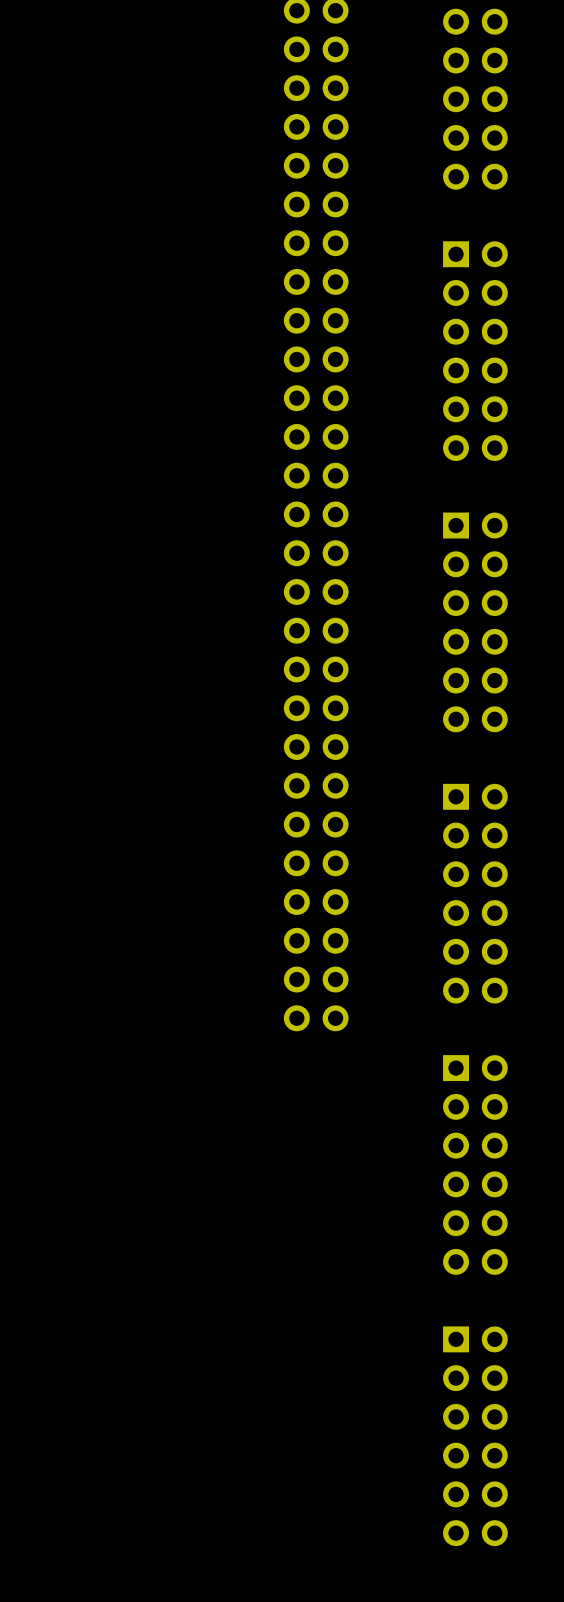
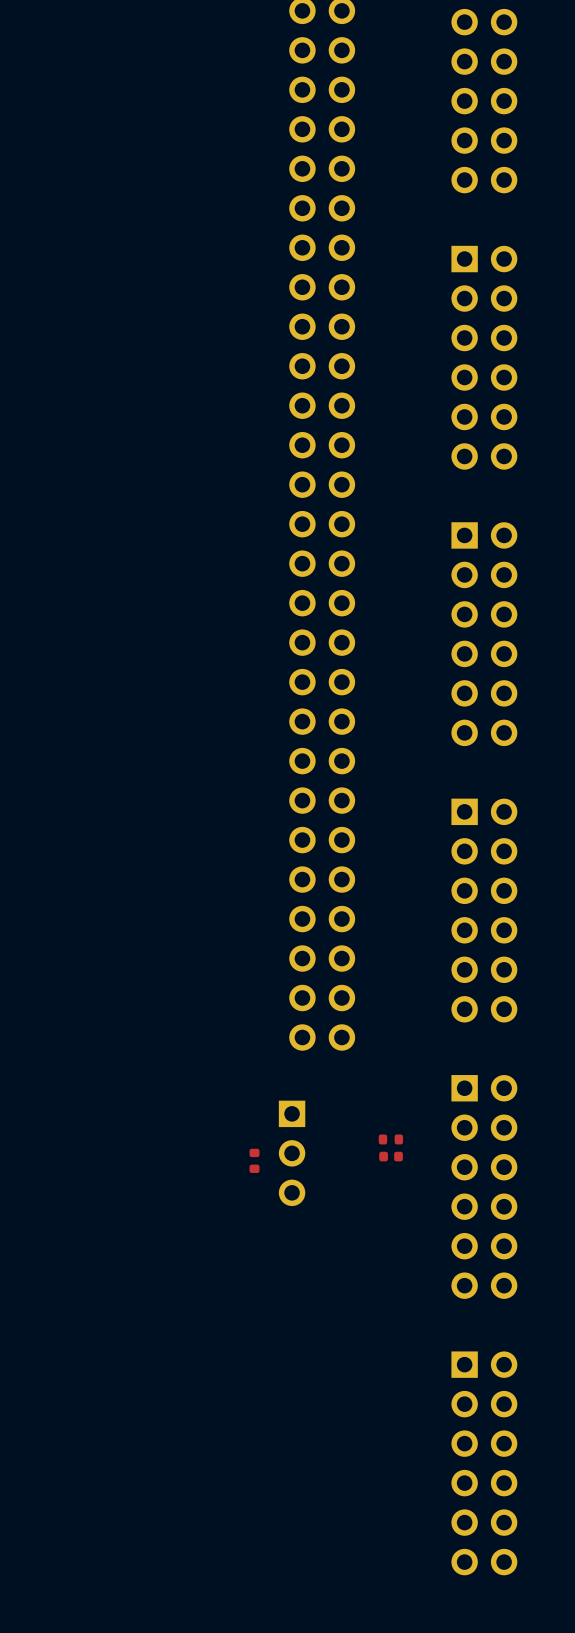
part: none -> (390, 1139)
part: none -> (292, 1153)
part: none -> (391, 1156)
part: none -> (254, 1160)

